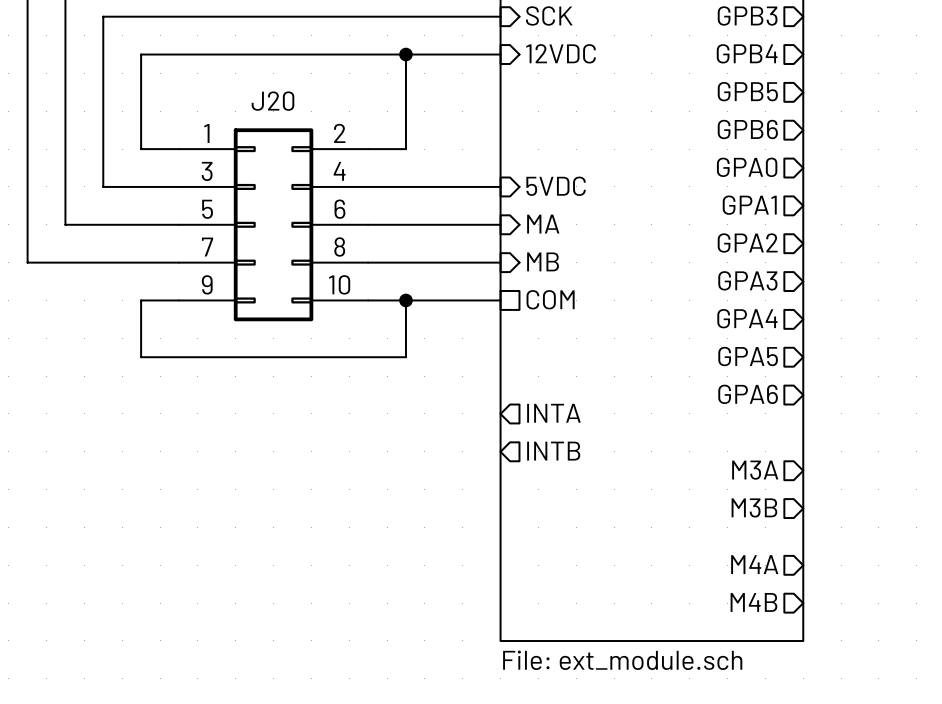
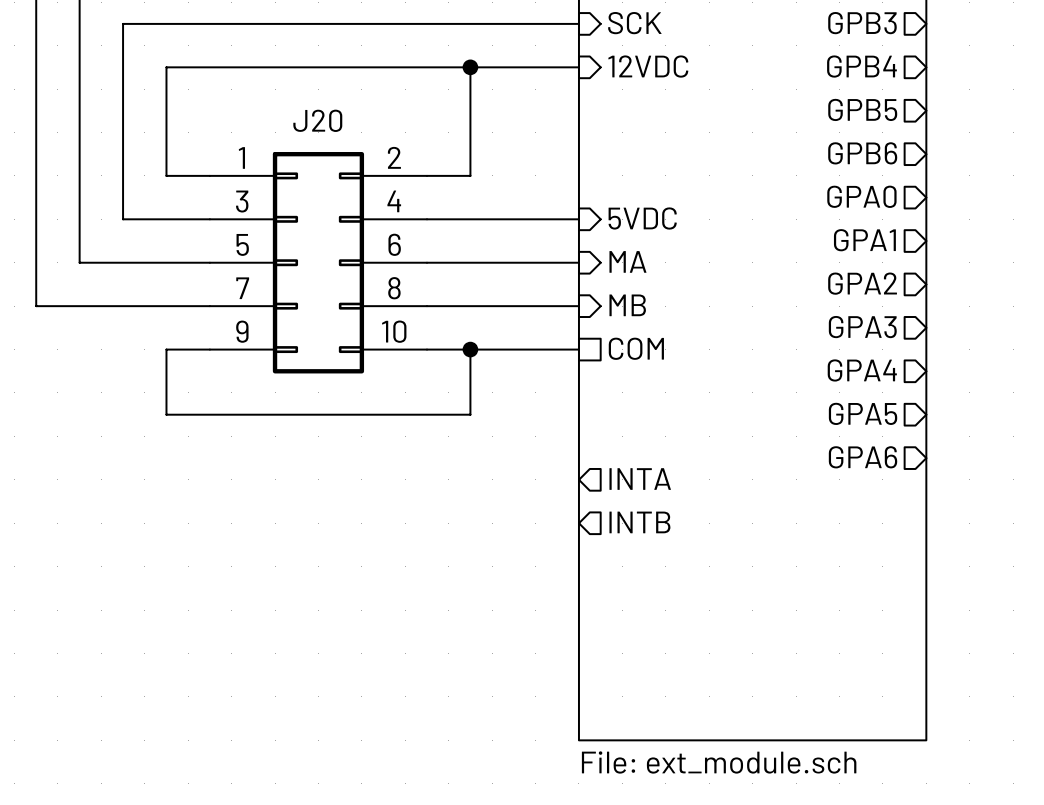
sheet pin: M3A (755, 470) -> none
sheet pin: M3B (754, 507) -> none
sheet pin: M4A (754, 564) -> none
sheet pin: M4B (753, 602) -> none

